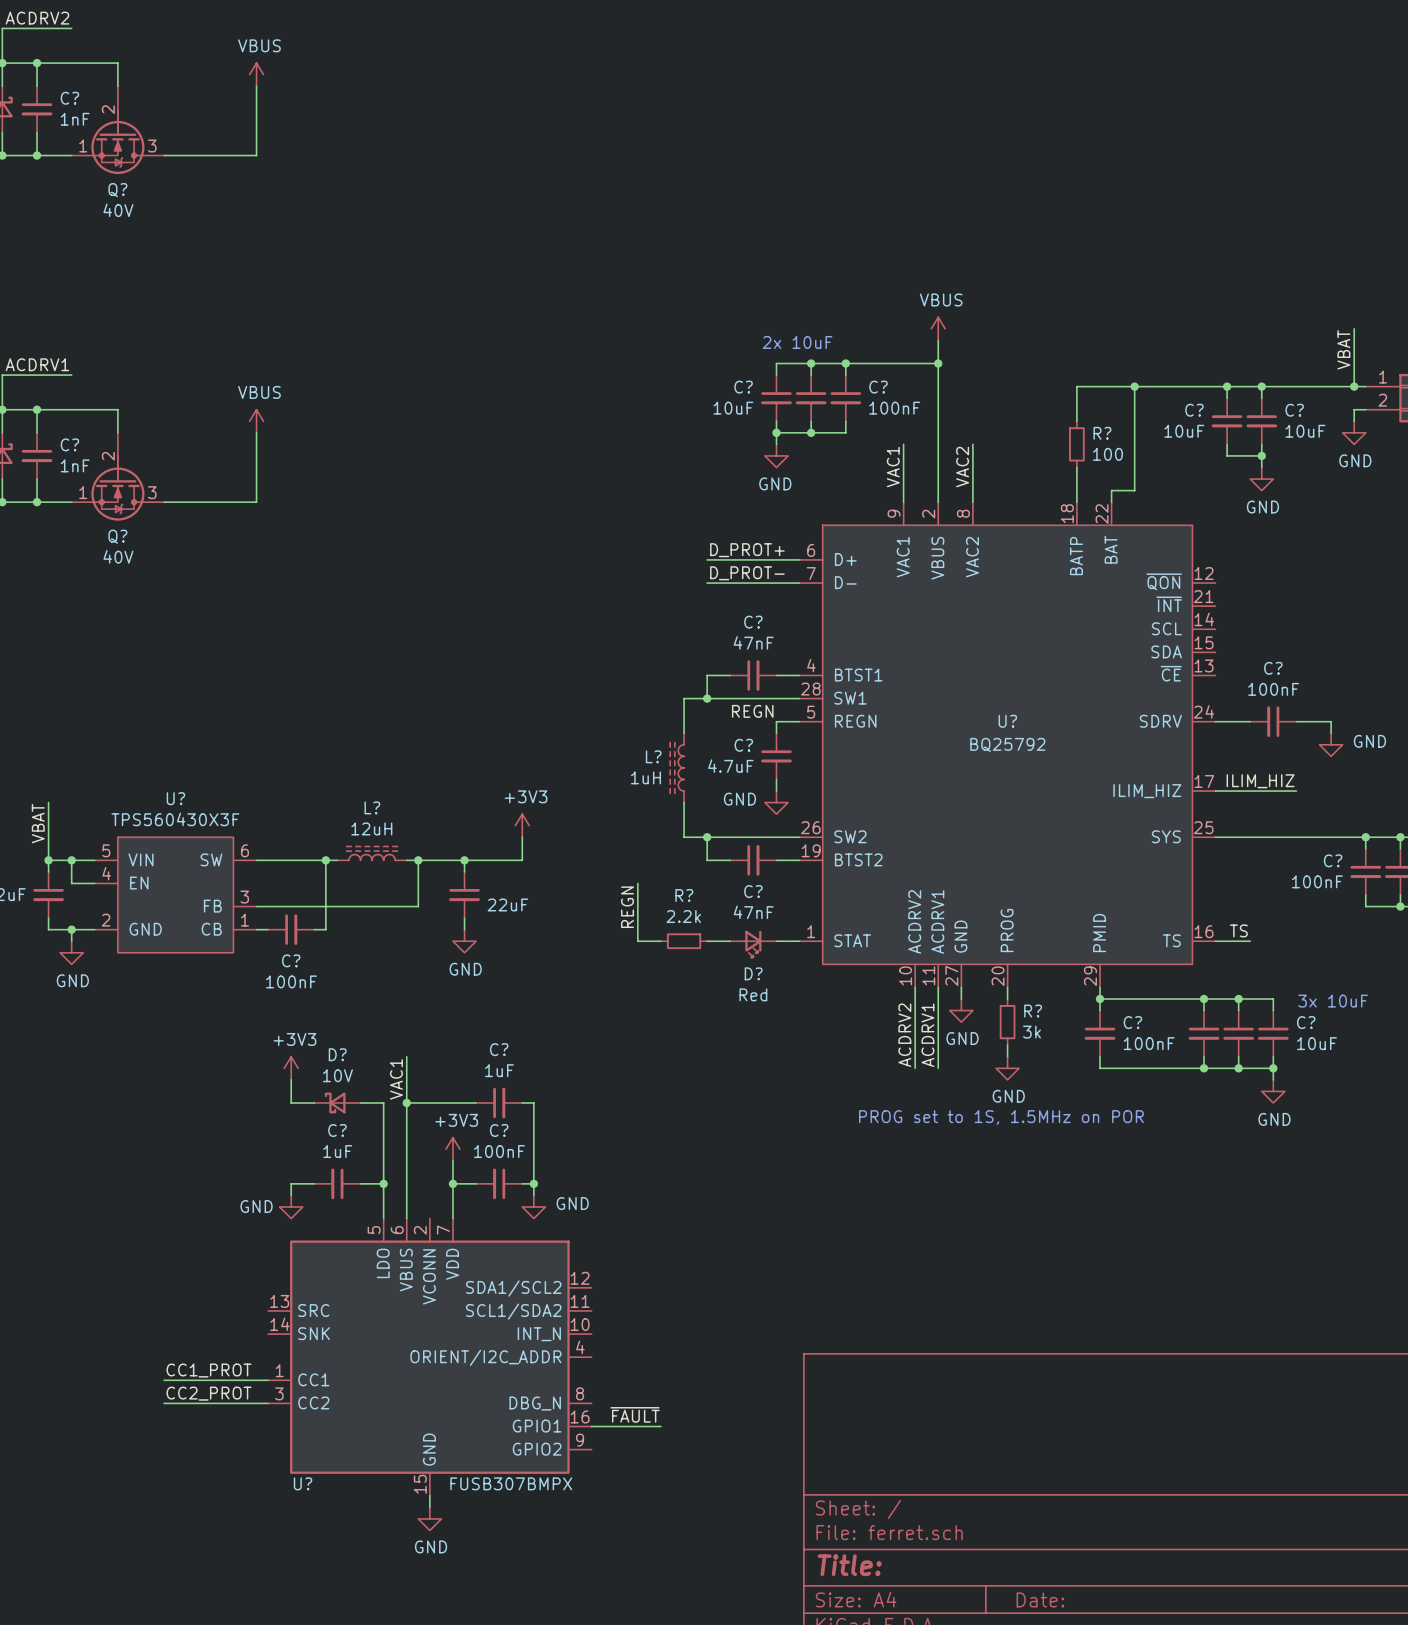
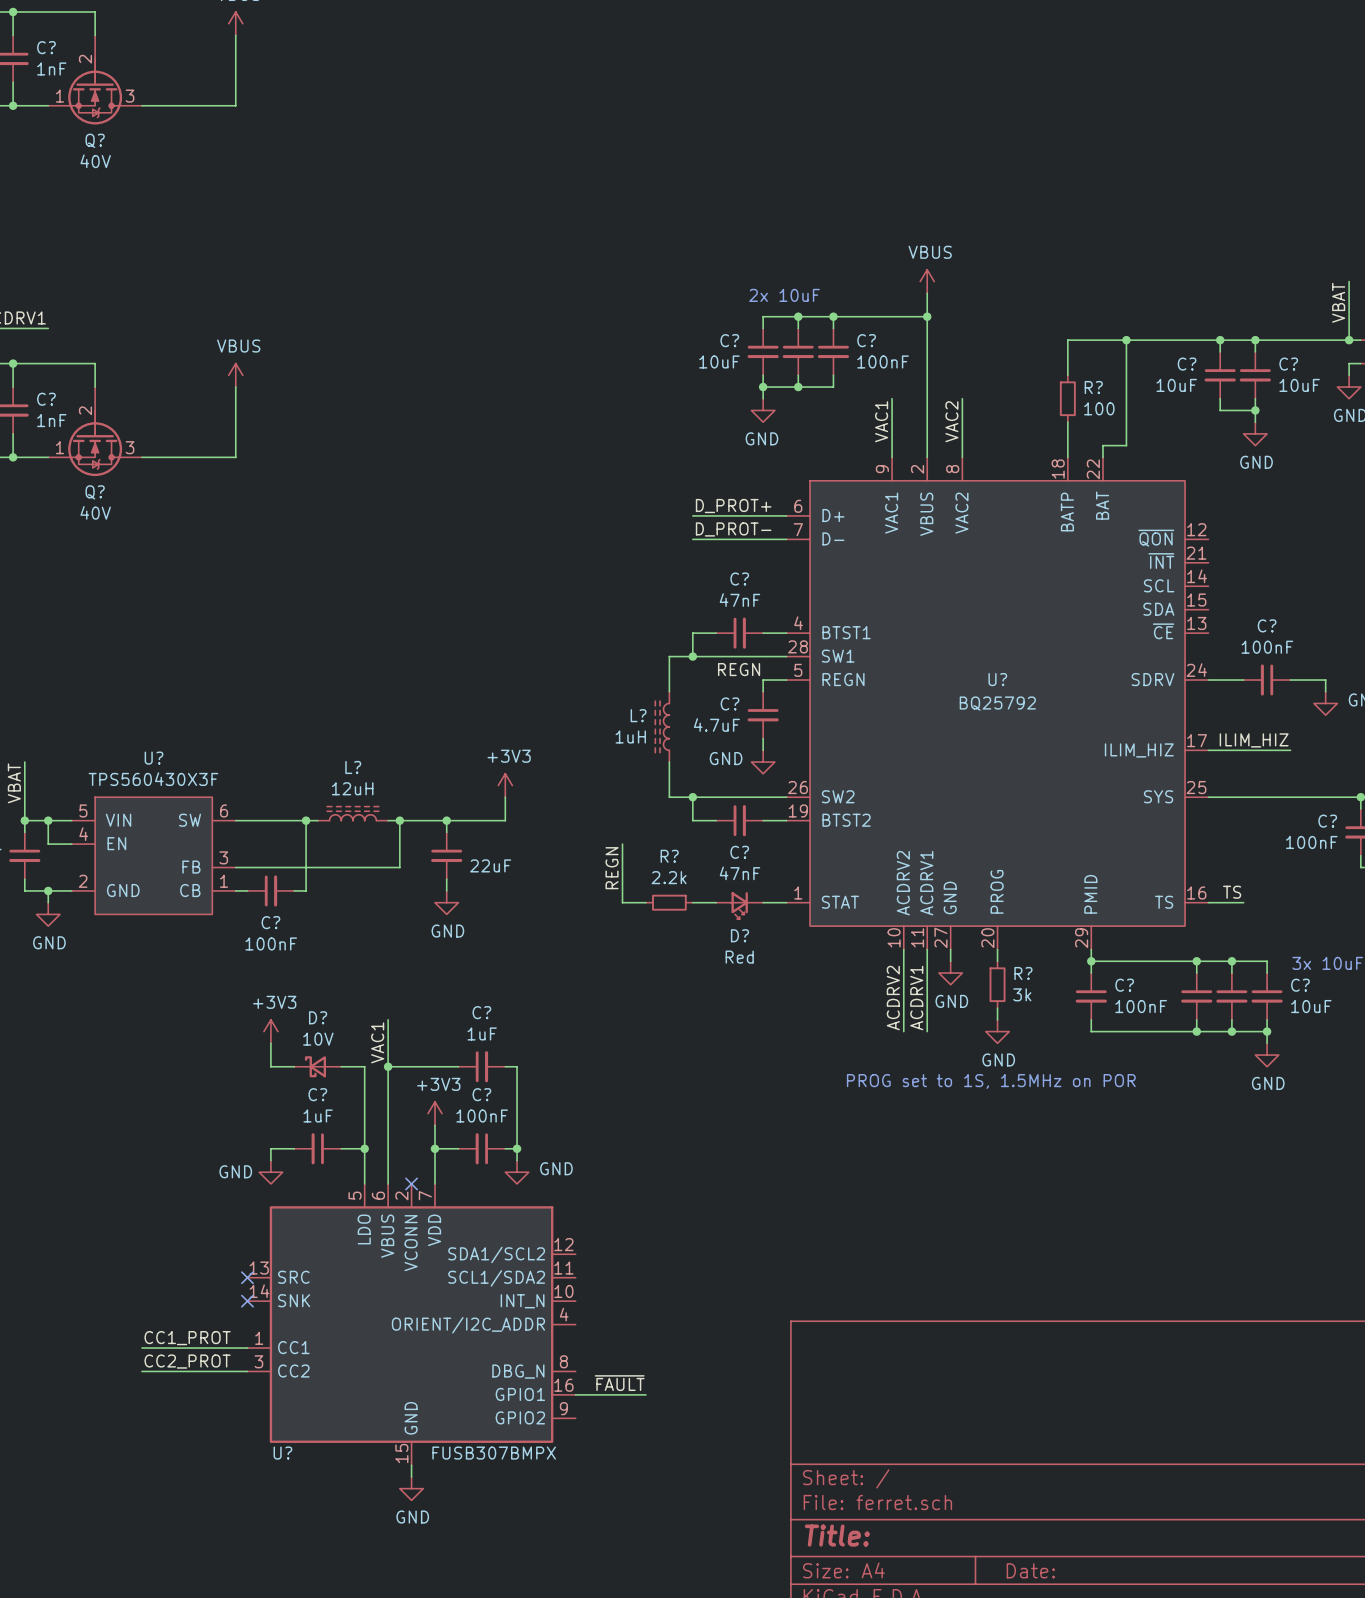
no-connect mark: none -> (411, 1183)
no-connect mark: none -> (247, 1277)
no-connect mark: none -> (247, 1301)

